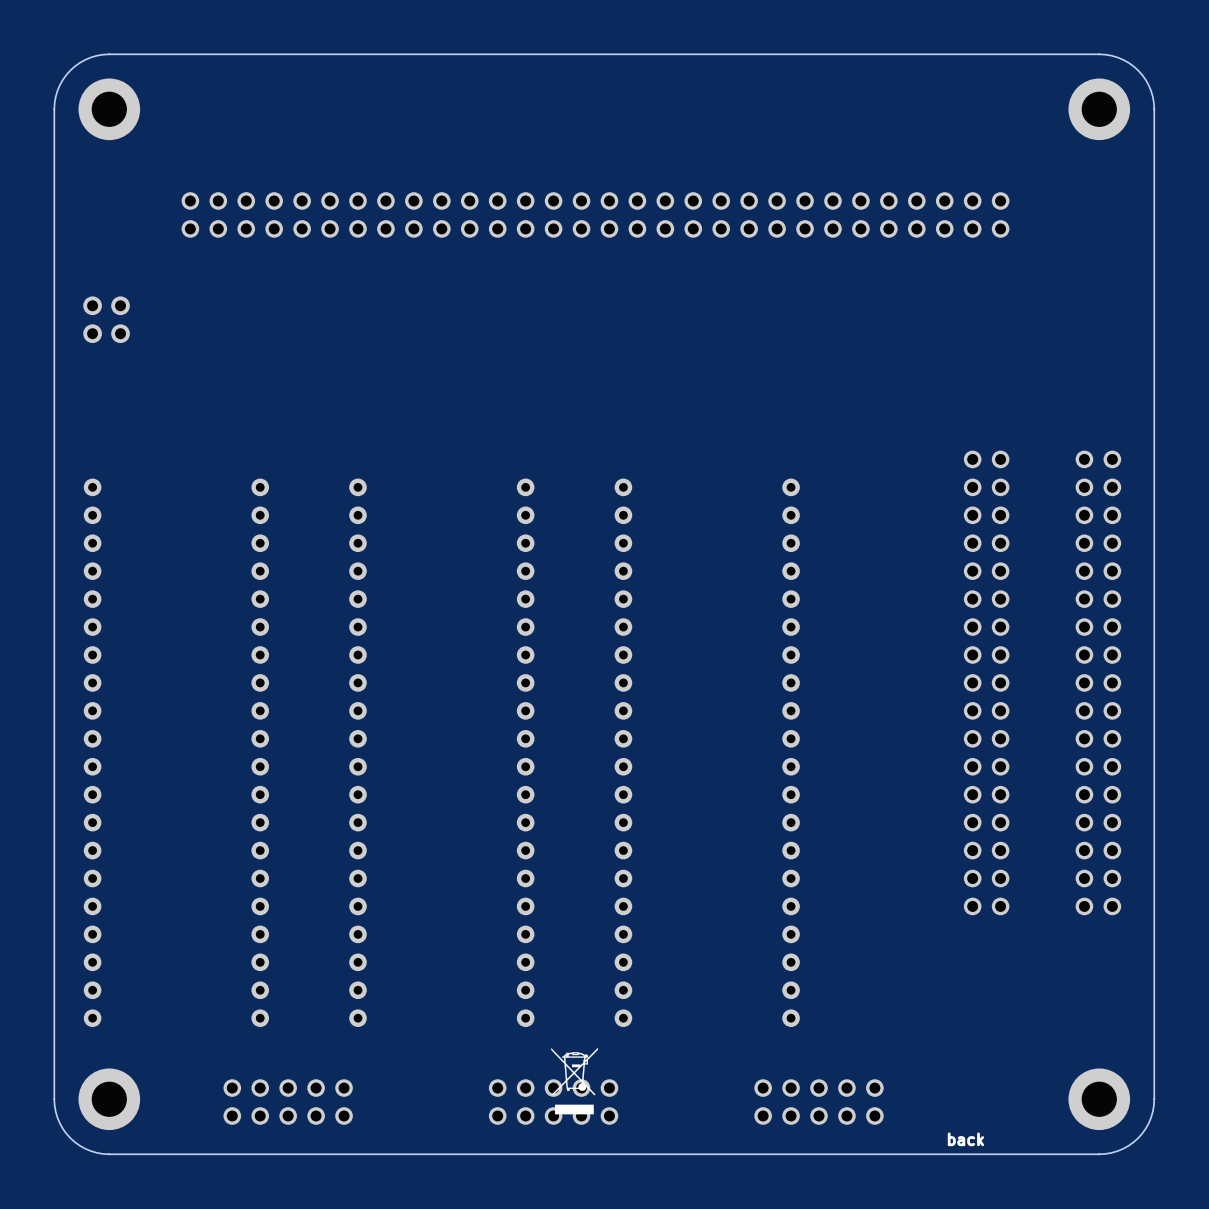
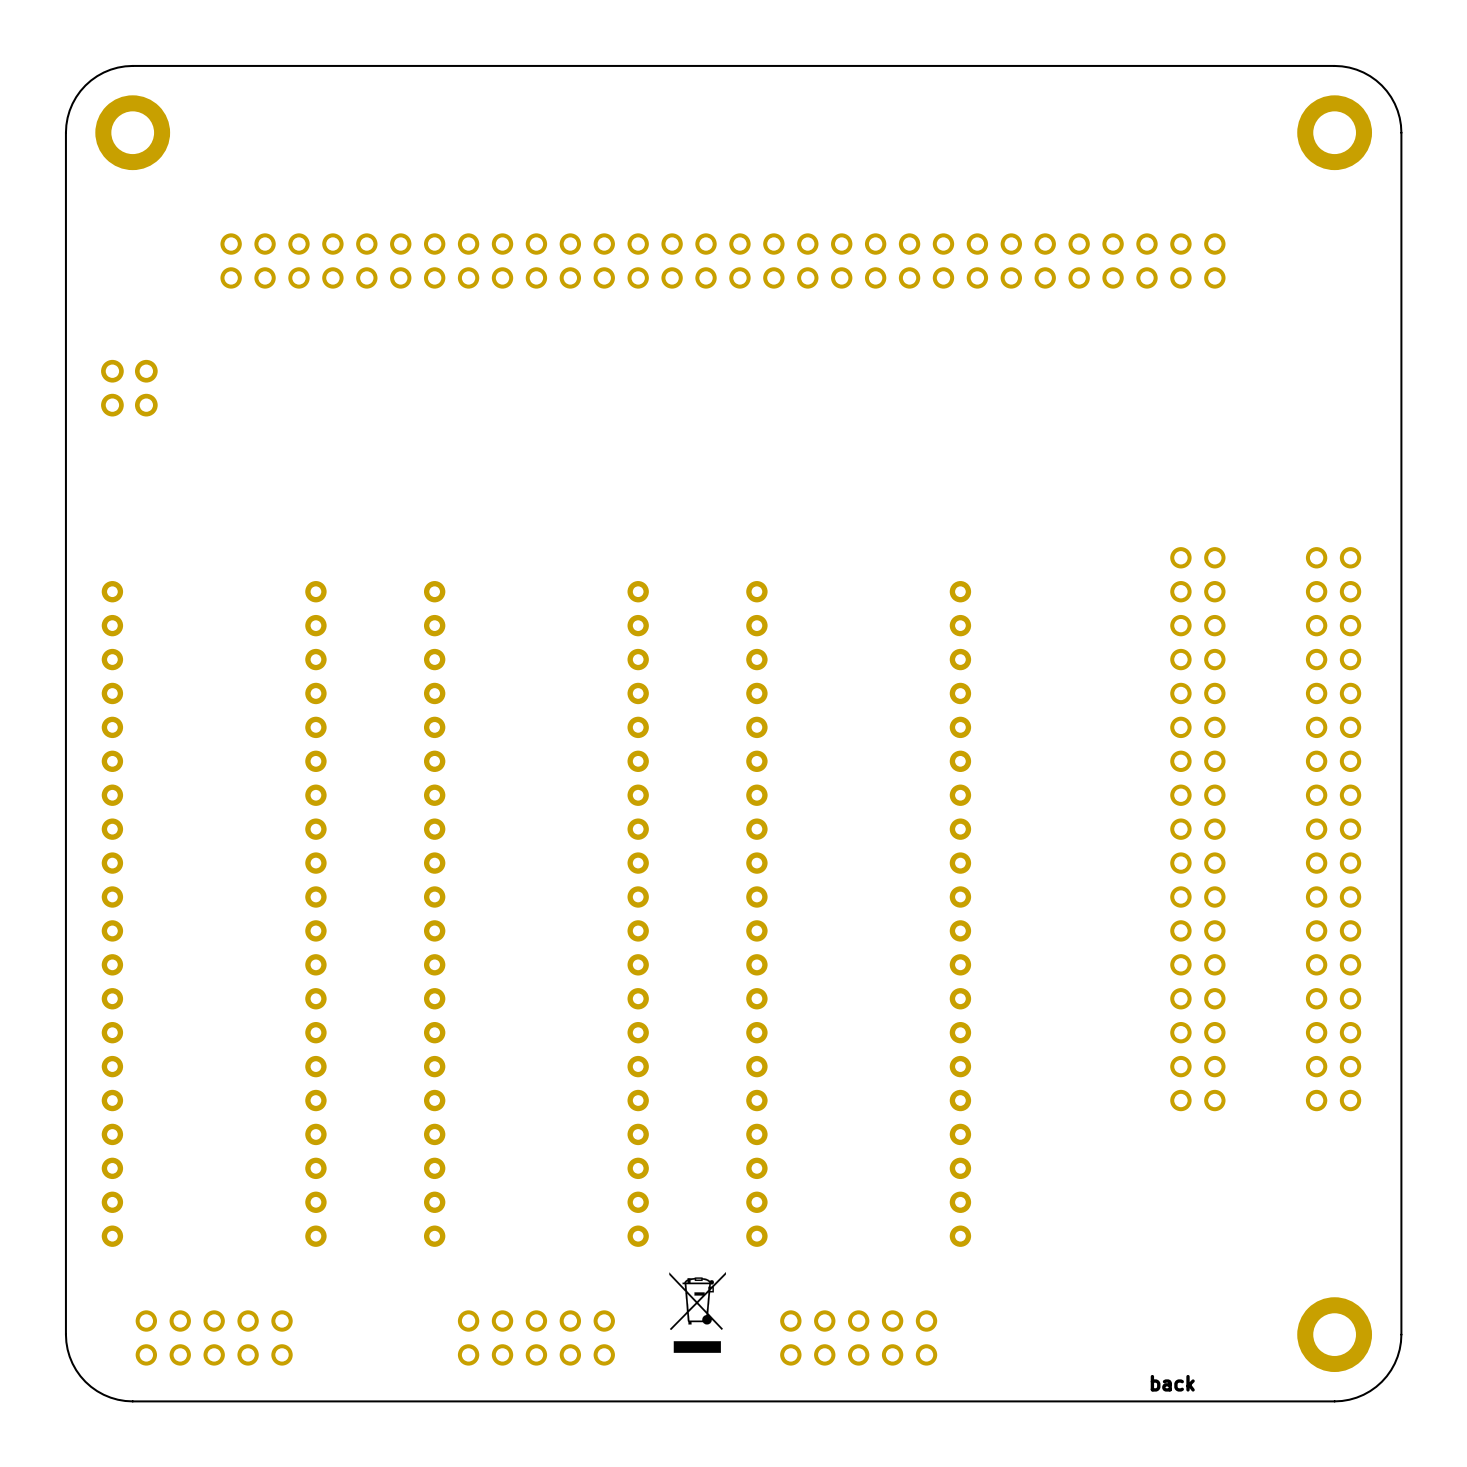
part: (109, 1099) -> none
part: none -> (214, 1337)
part: (288, 1102) -> none
part: none -> (536, 1337)
part: (553, 1102) -> none
part: none -> (858, 1337)
part: (819, 1102) -> none

